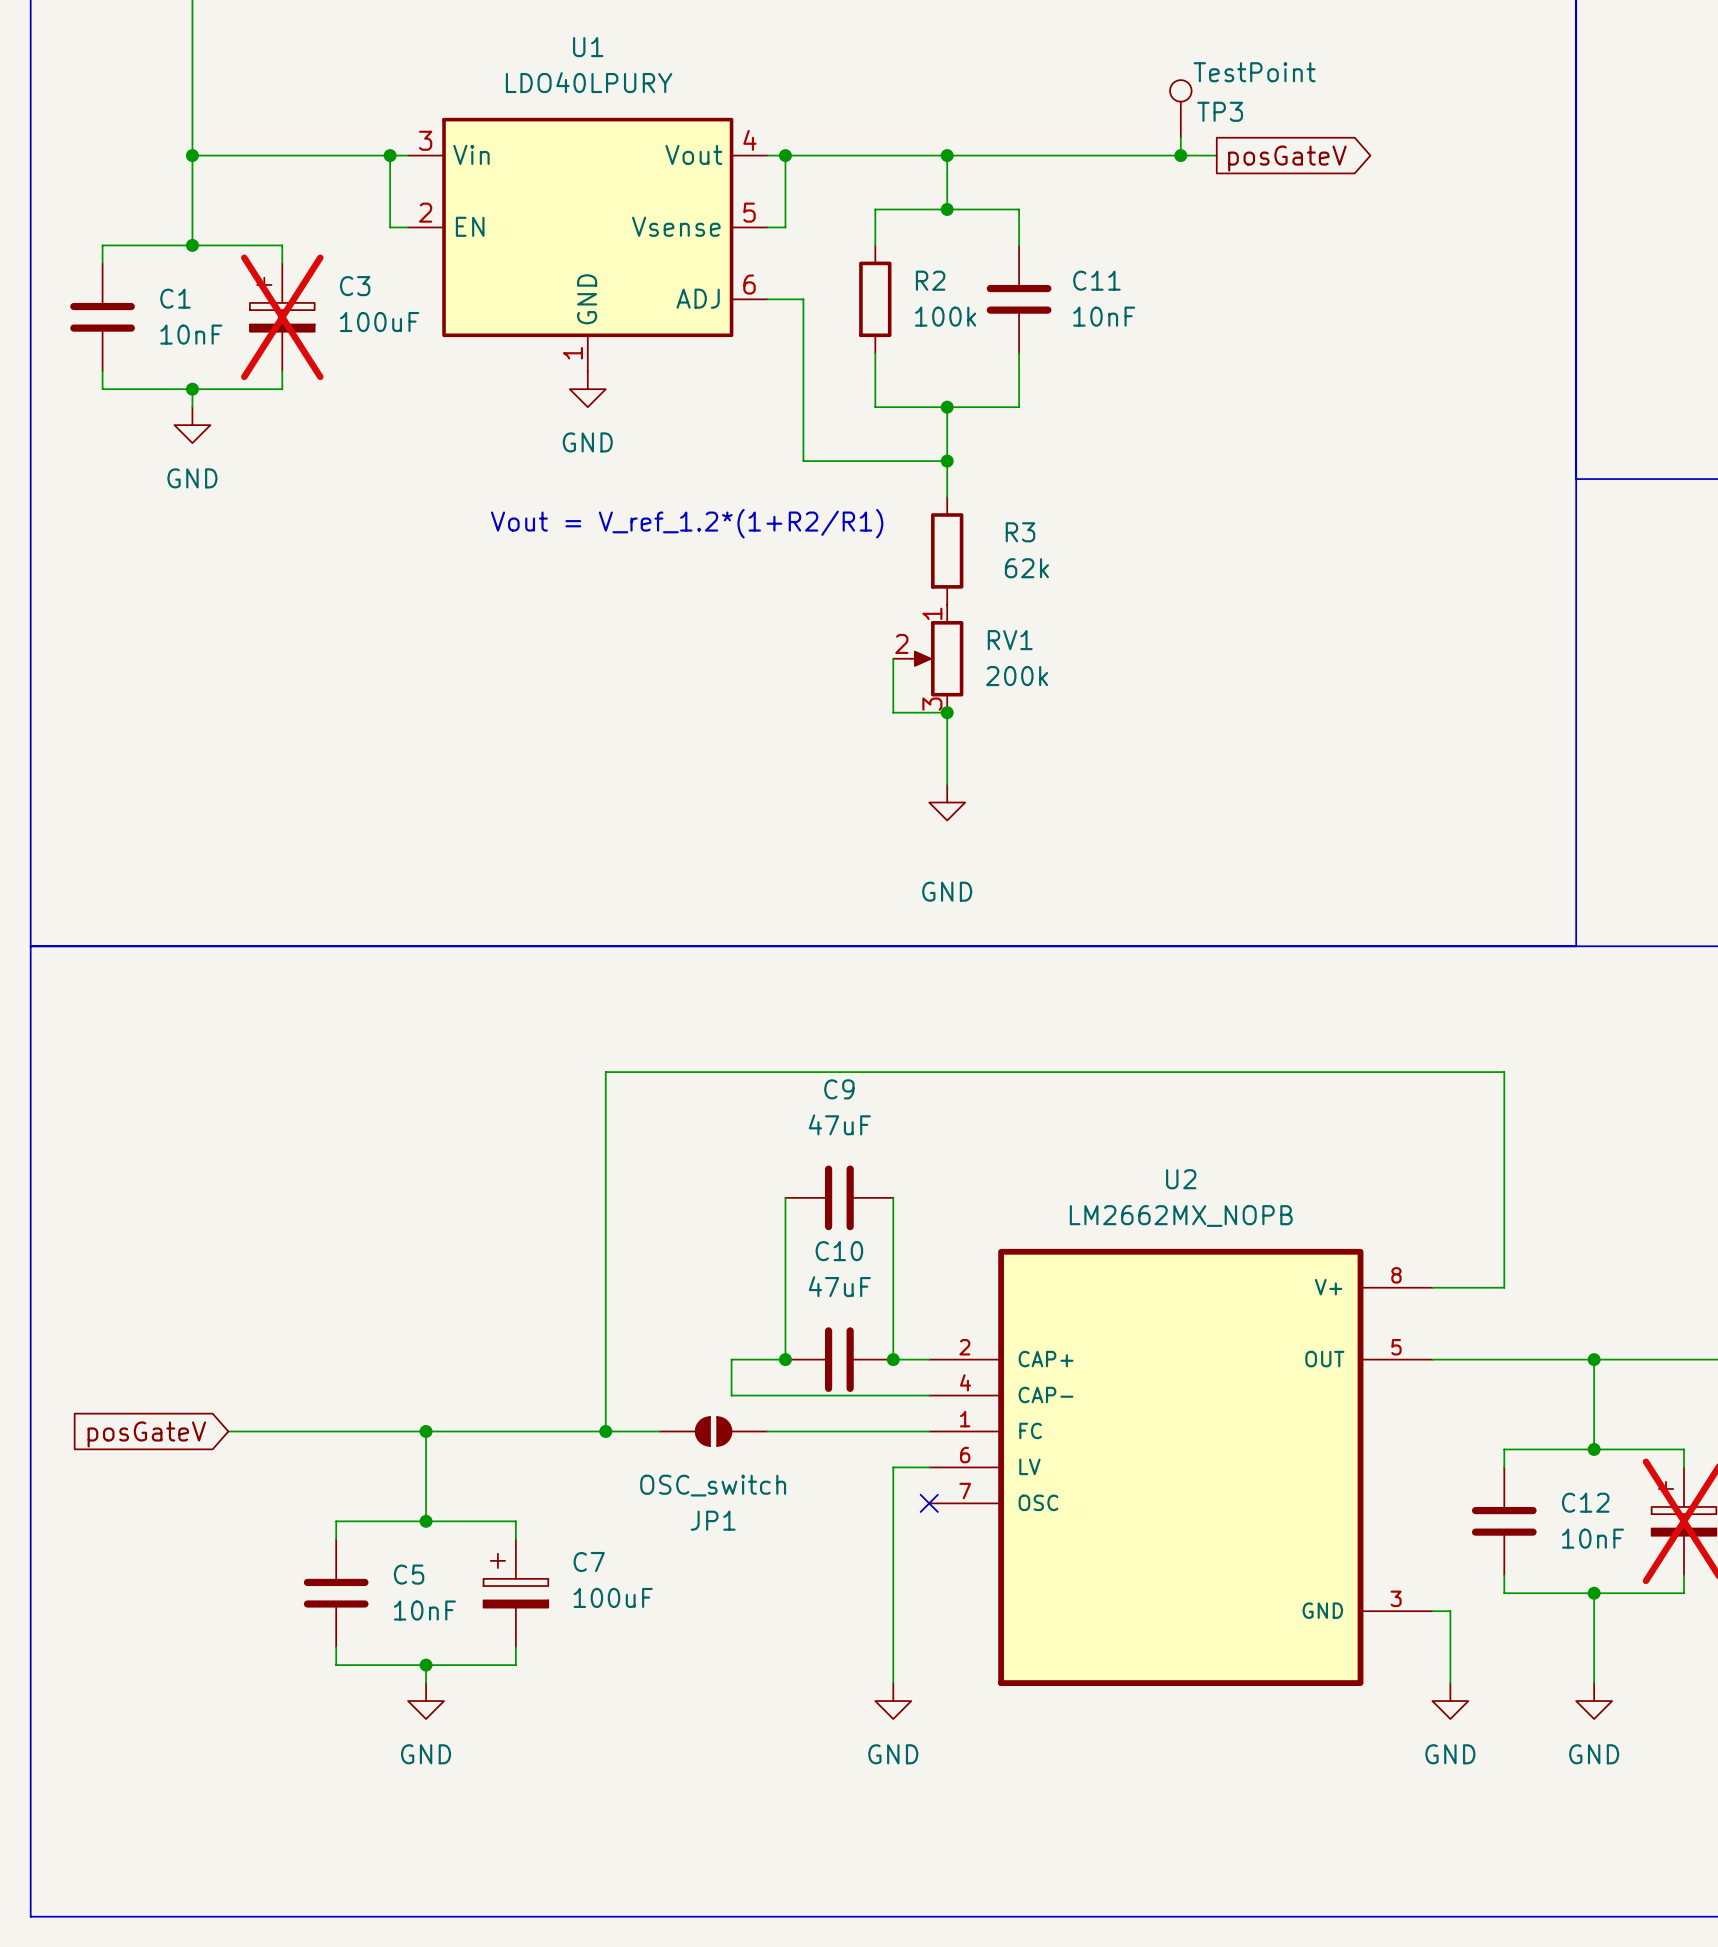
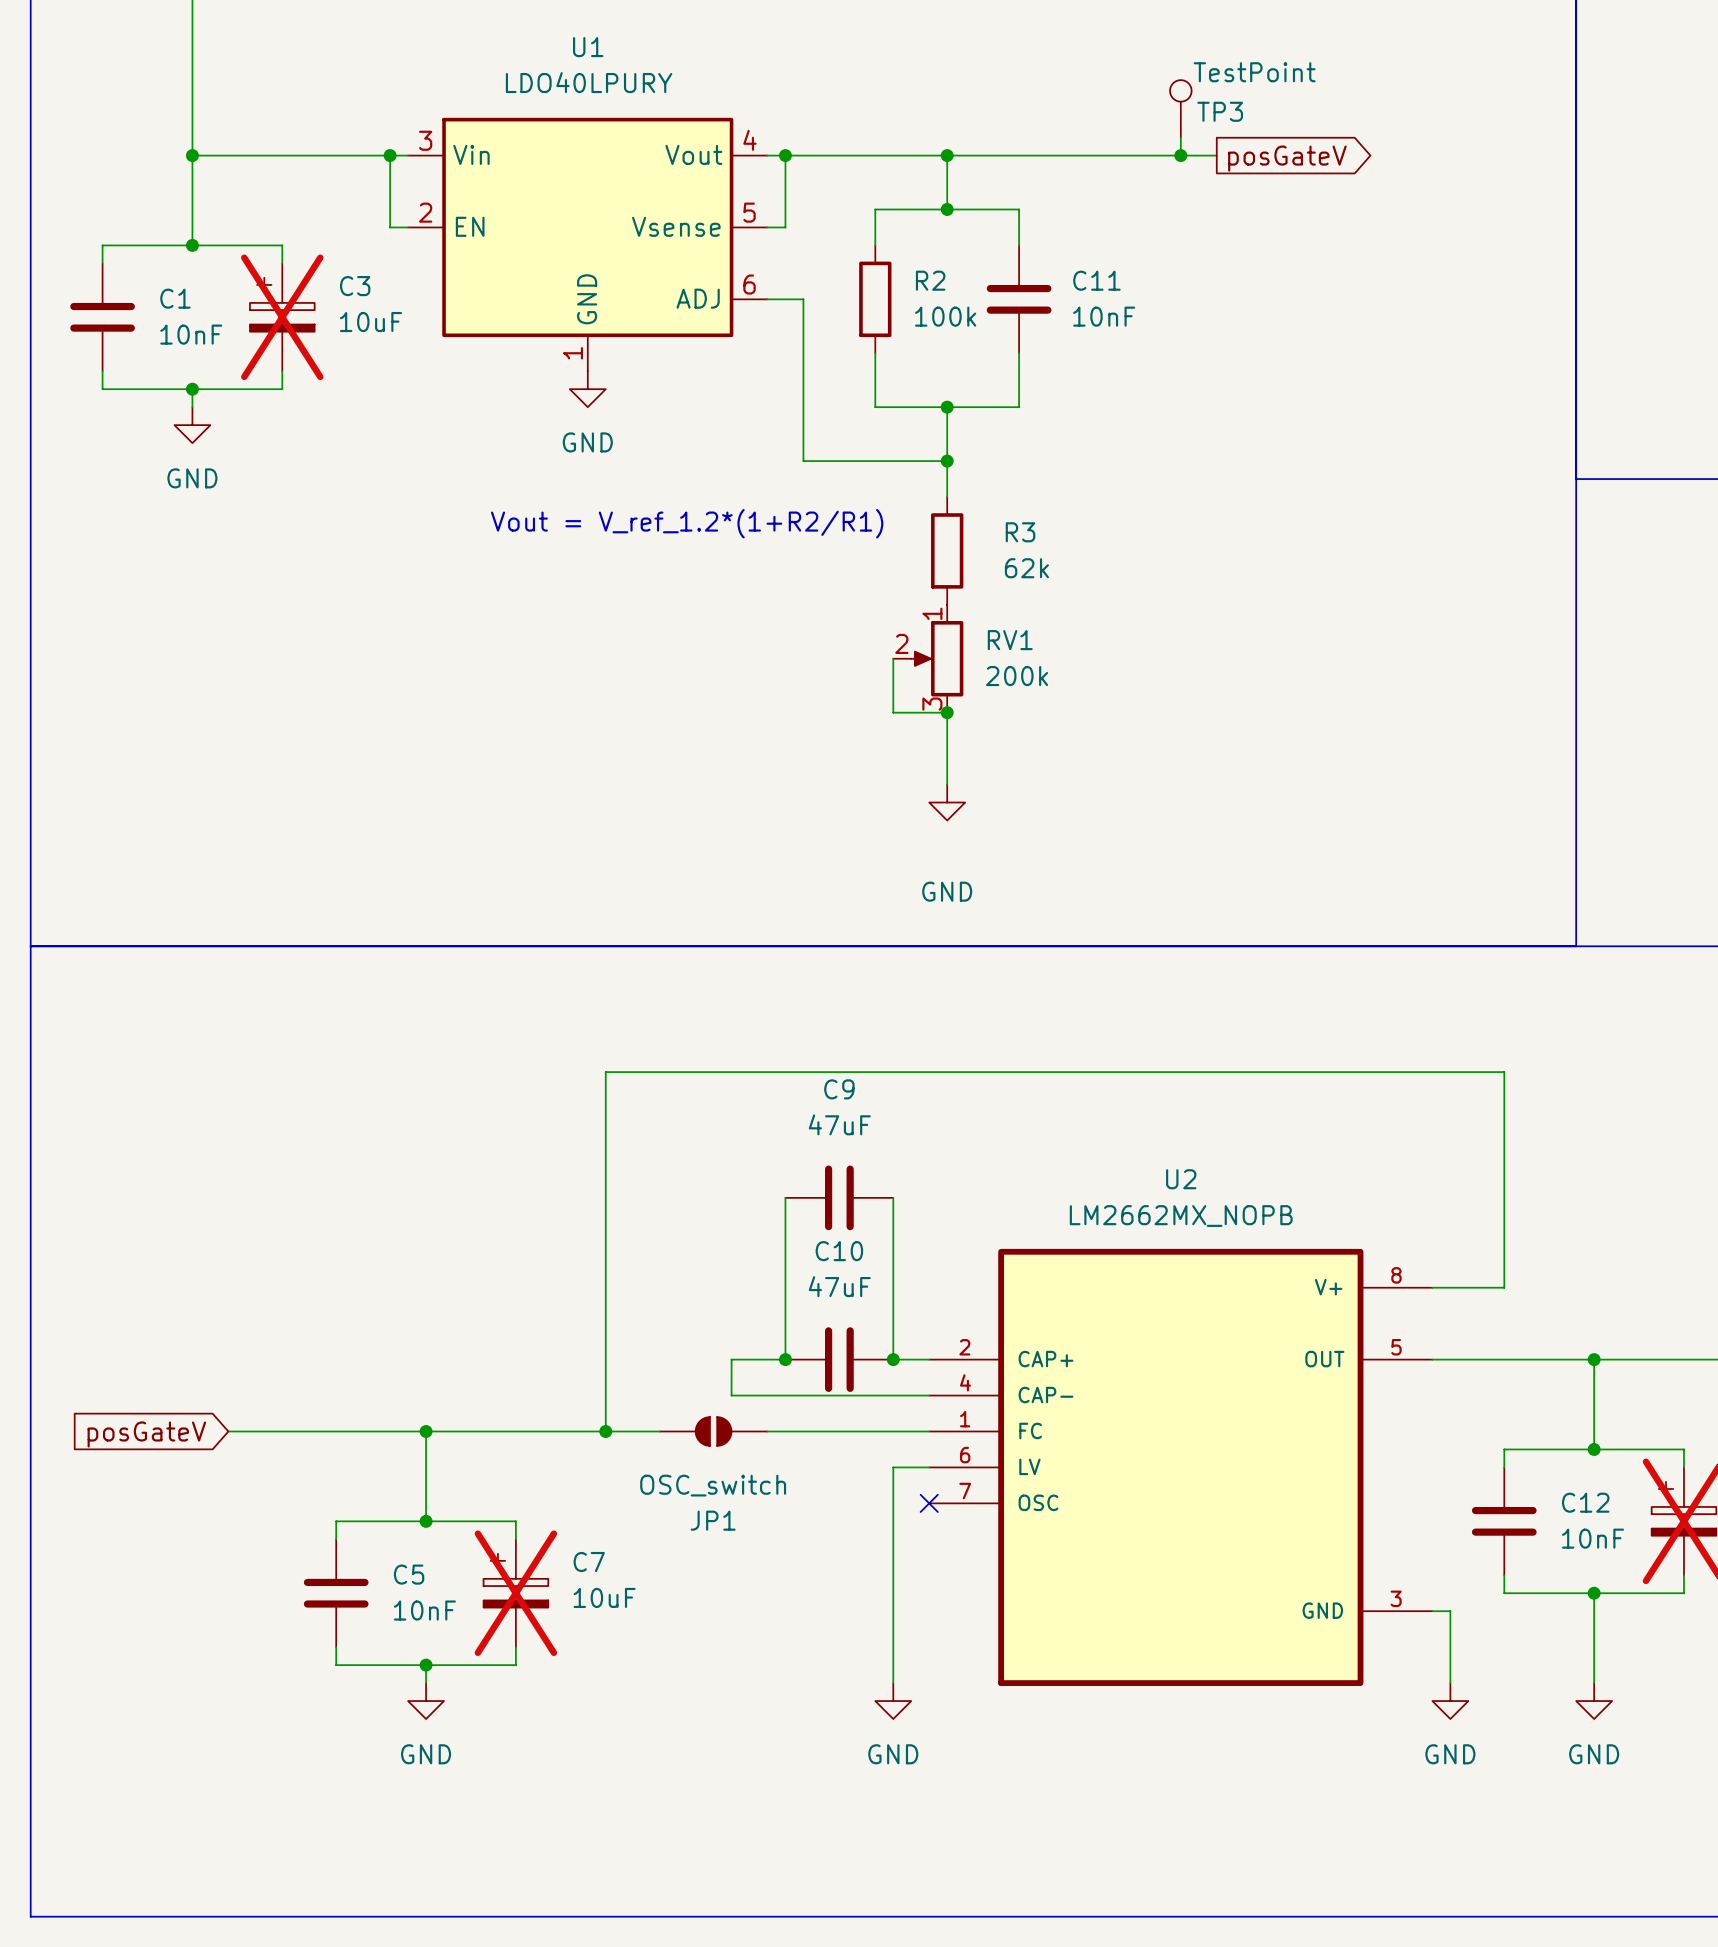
C3 value: 100uF (379, 322) -> 10uF (370, 322)
C7 do-not-place cross: none -> (515, 1593)
C7 value: 100uF (613, 1597) -> 10uF (604, 1597)

